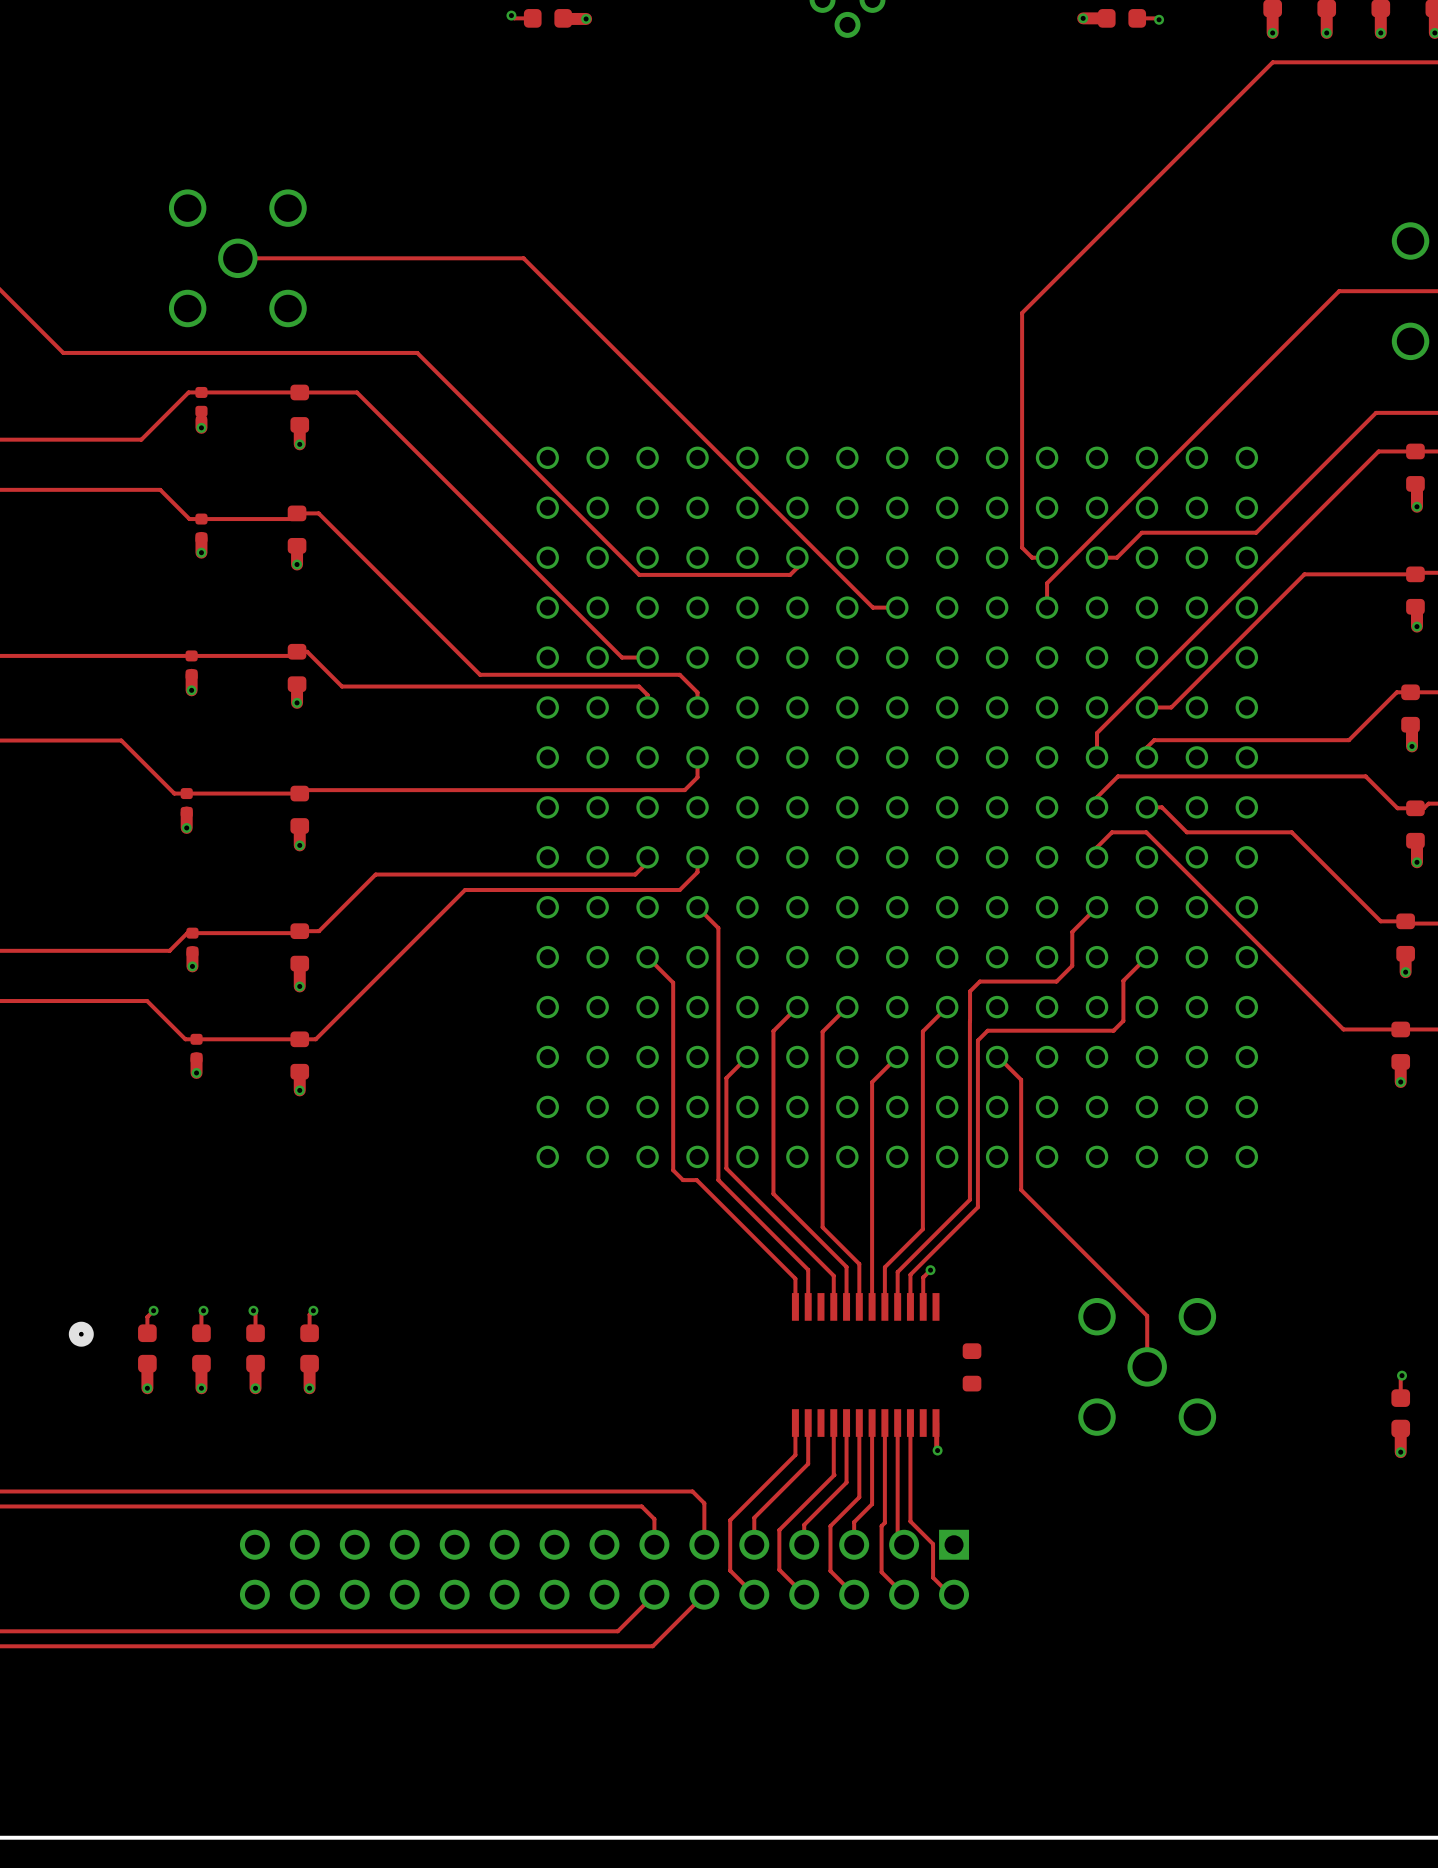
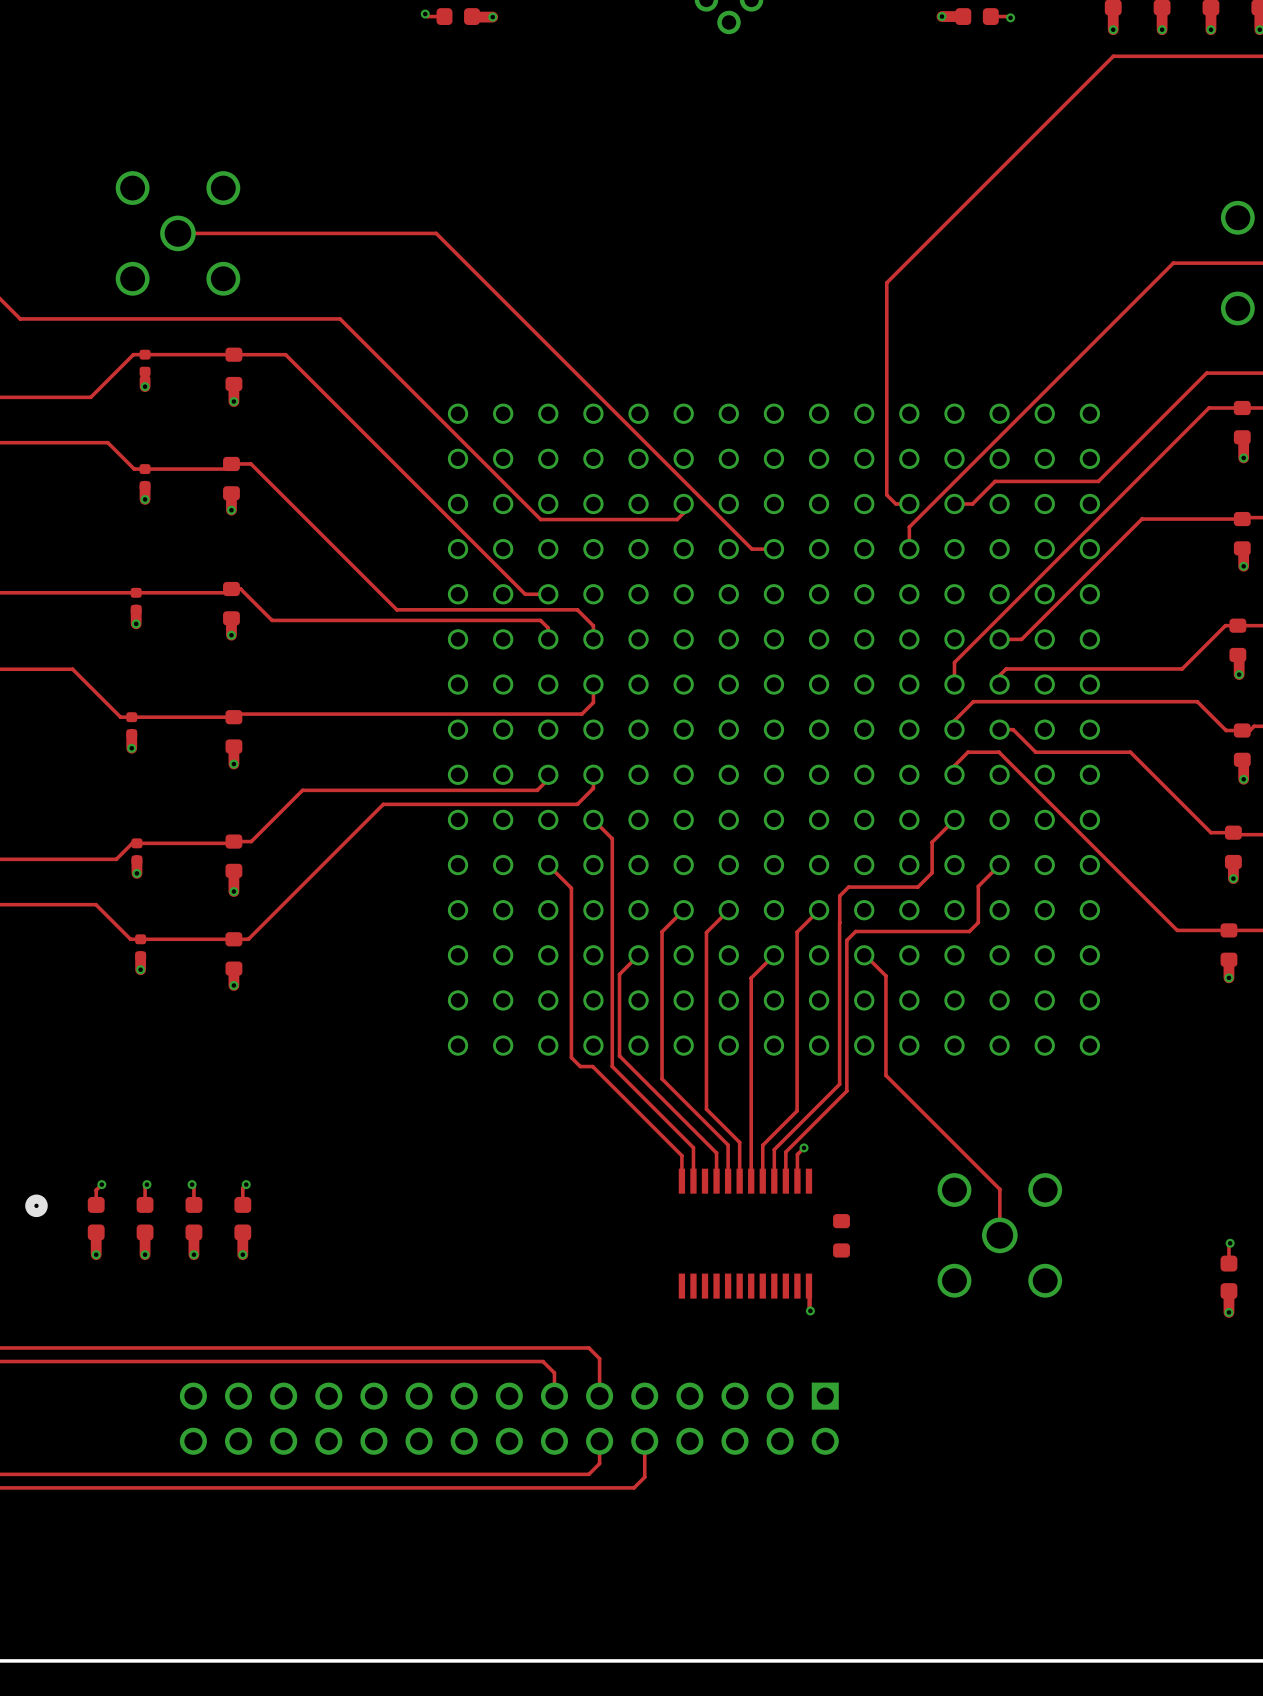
top track: (795, 1423) (795, 1455) (730, 1520) (730, 1570) (754, 1594) -> (552, 1487) (634, 1487) (644, 1477) (644, 1441)
top track: (808, 1423) (808, 1463) (754, 1517) (754, 1544) -> none
top track: (833, 1423) (834, 1475) (779, 1530) (779, 1569) (804, 1594) -> none
top track: (846, 1423) (846, 1482) (804, 1524) (804, 1544) -> none
top track: (859, 1423) (859, 1497) (830, 1526) (830, 1570) (854, 1594) -> none
top track: (872, 1423) (872, 1504) (854, 1522) (854, 1544) -> none
top track: (884, 1423) (884, 1522) (881, 1526) (881, 1572) (904, 1594) -> none
top track: (897, 1423) (897, 1538) (904, 1544) -> none
top track: (910, 1423) (910, 1521) (933, 1544) (933, 1577) (950, 1594) (954, 1594) -> none
top track: (654, 1594) (617, 1631) -> none
top track: (704, 1594) (652, 1646) -> (599, 1441) (599, 1463) (588, 1474) (521, 1474)

